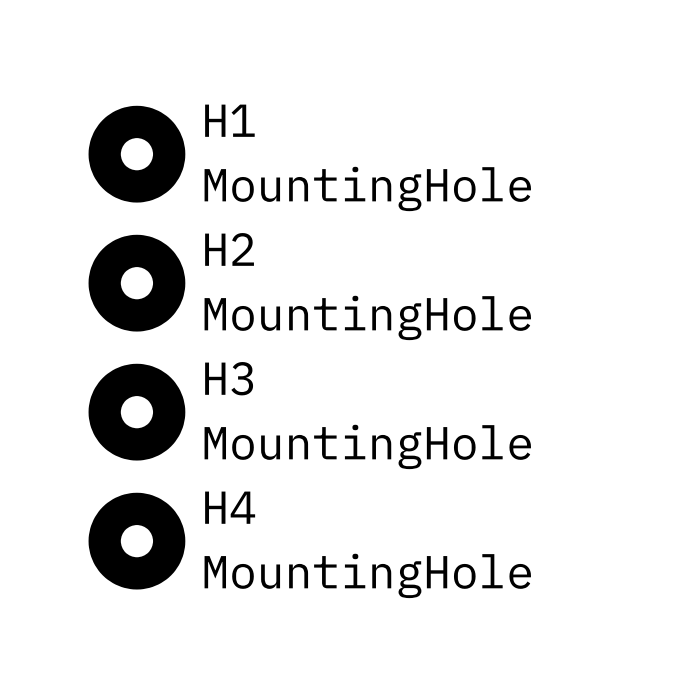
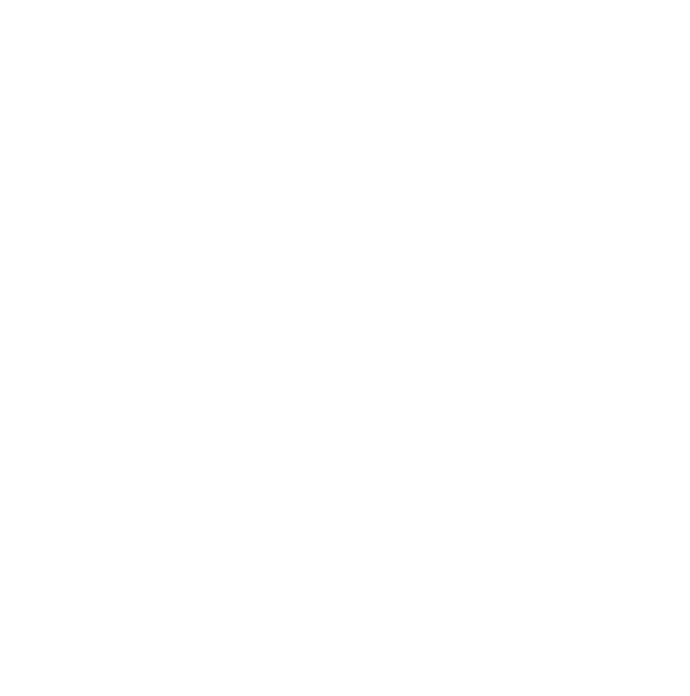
H1: MountingHole (136, 154) -> none
H2: MountingHole (136, 283) -> none
H3: MountingHole (136, 412) -> none
H4: MountingHole (136, 541) -> none

